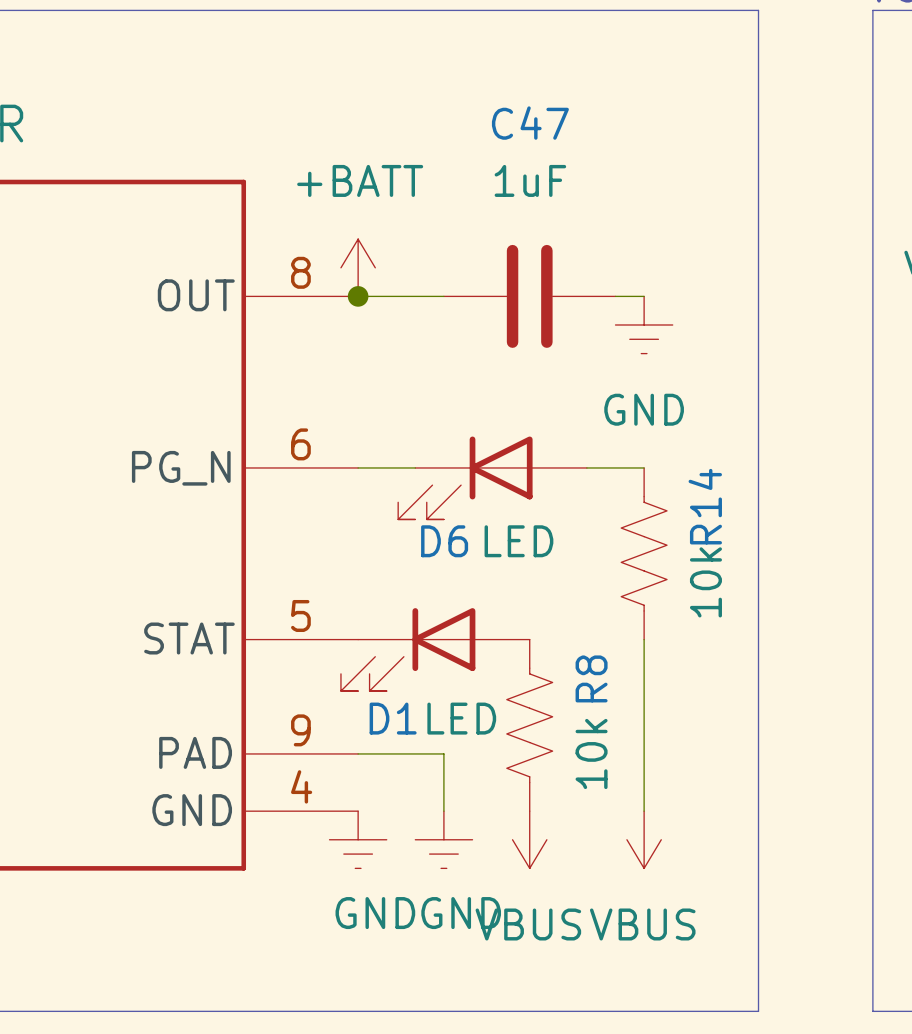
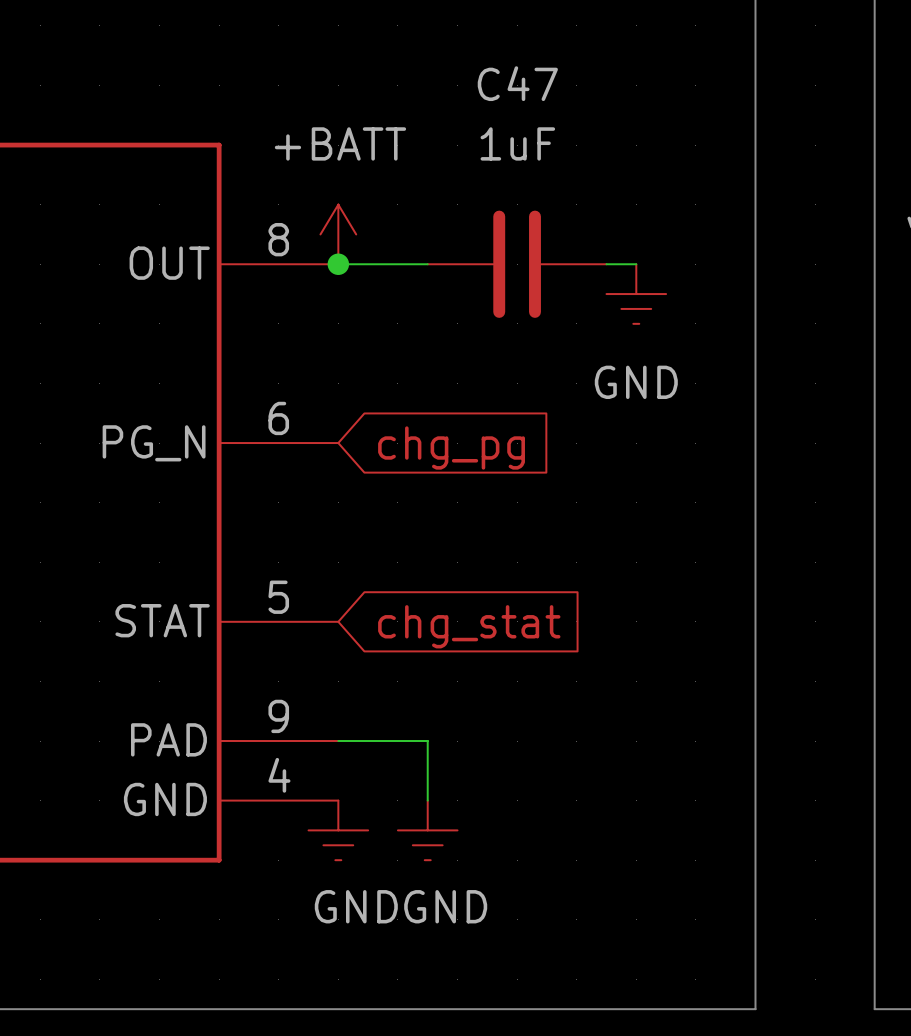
wire: (358, 467) (415, 467) -> none
wire: (586, 467) (644, 467) -> none
global label: none -> chg_pg (451, 447)
D6: LED (492, 477) -> none
R14: 10k (644, 553) -> none
wire: (644, 639) (644, 811) -> none
global label: none -> chg_stat (469, 626)
D1: LED (435, 649) -> none
R8: 10k (529, 725) -> none
power symbol: VBUS (529, 839) -> none
power symbol: VBUS (644, 839) -> none

